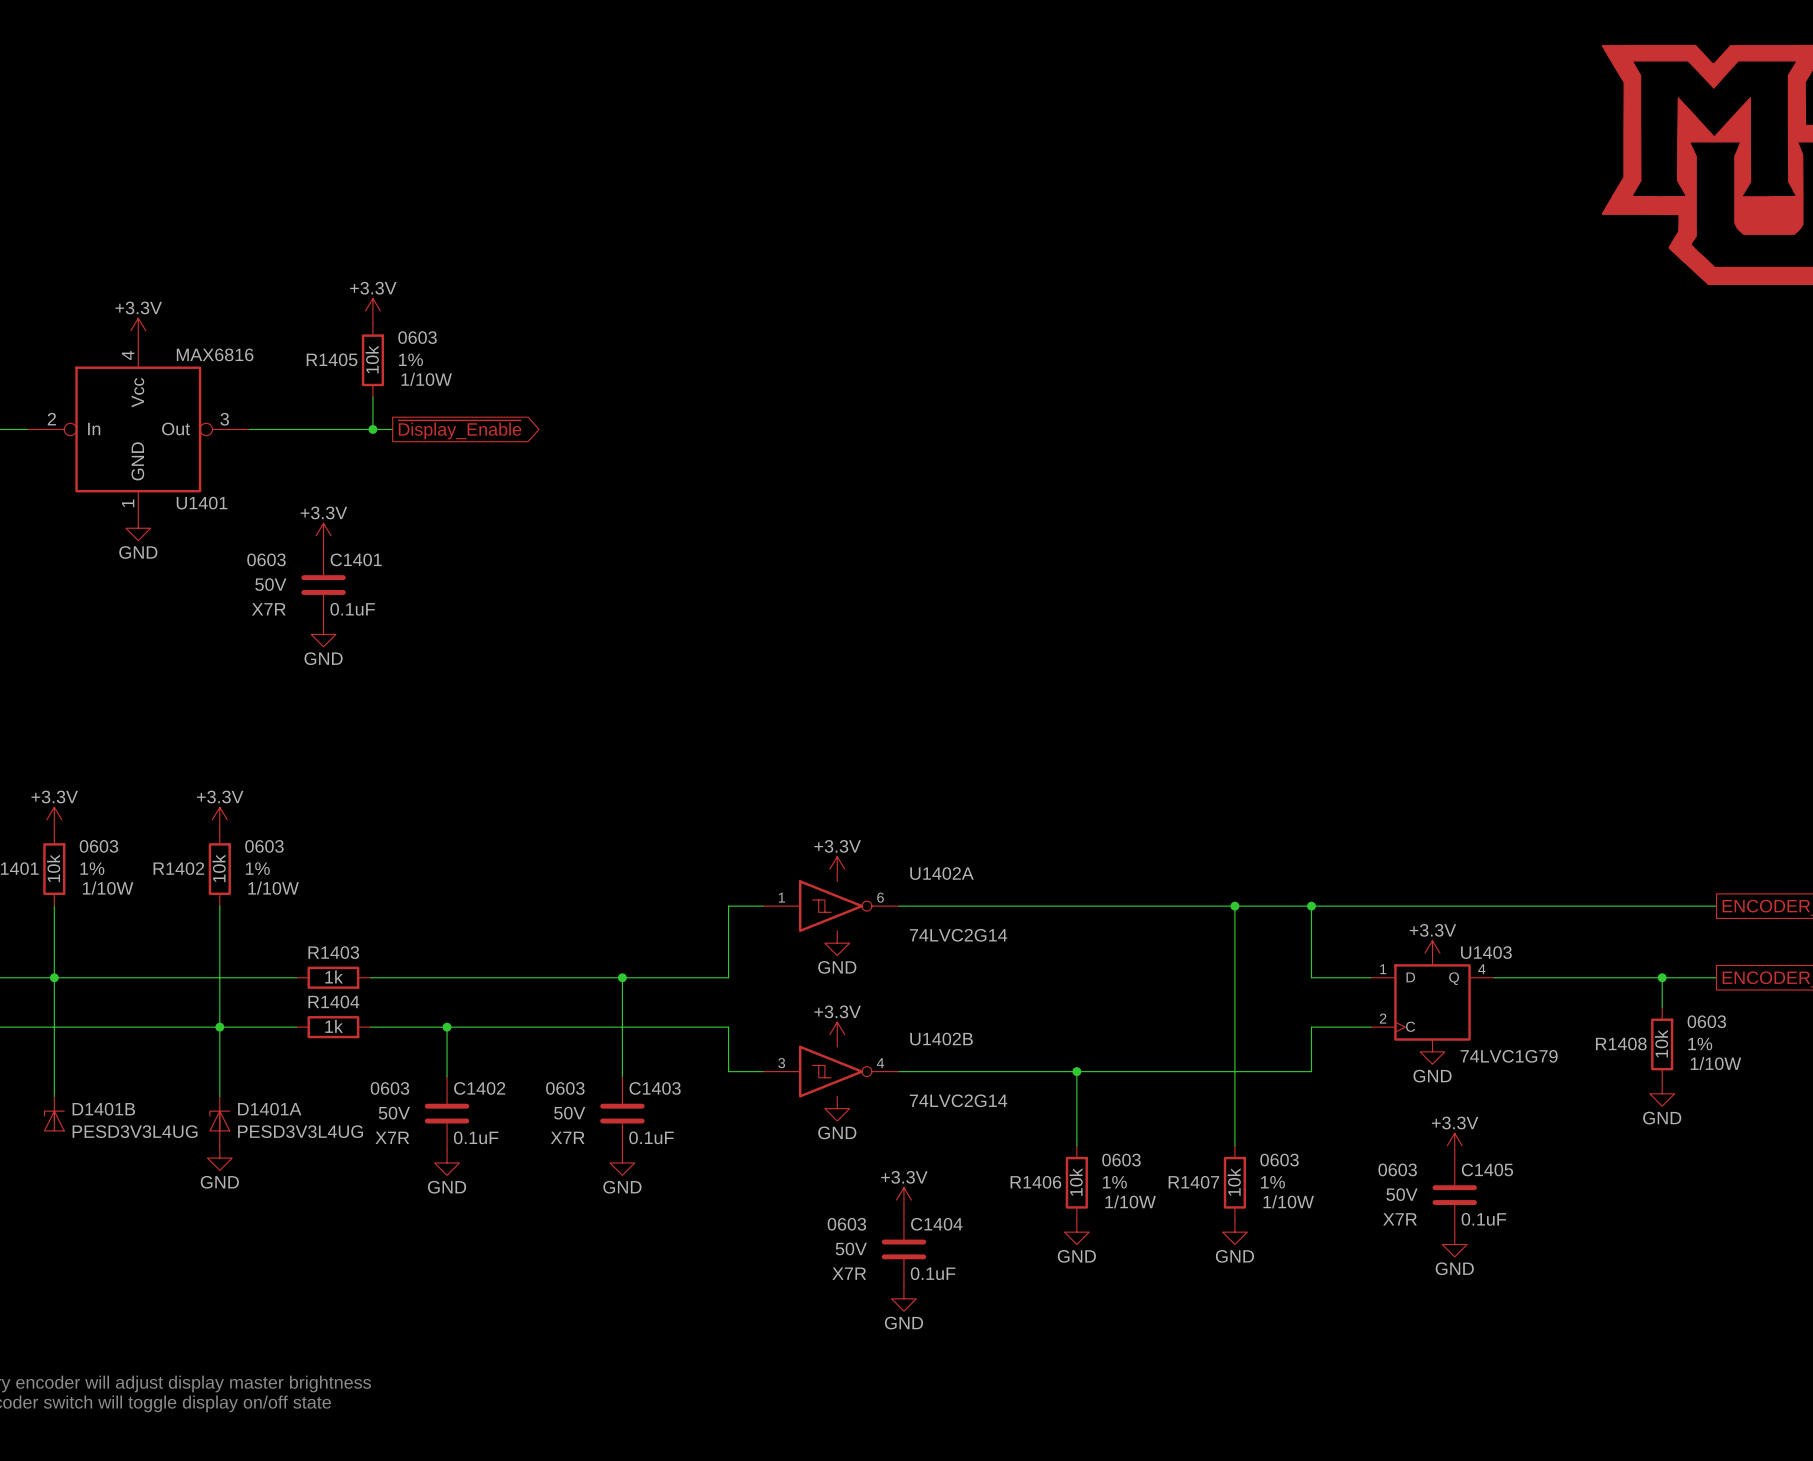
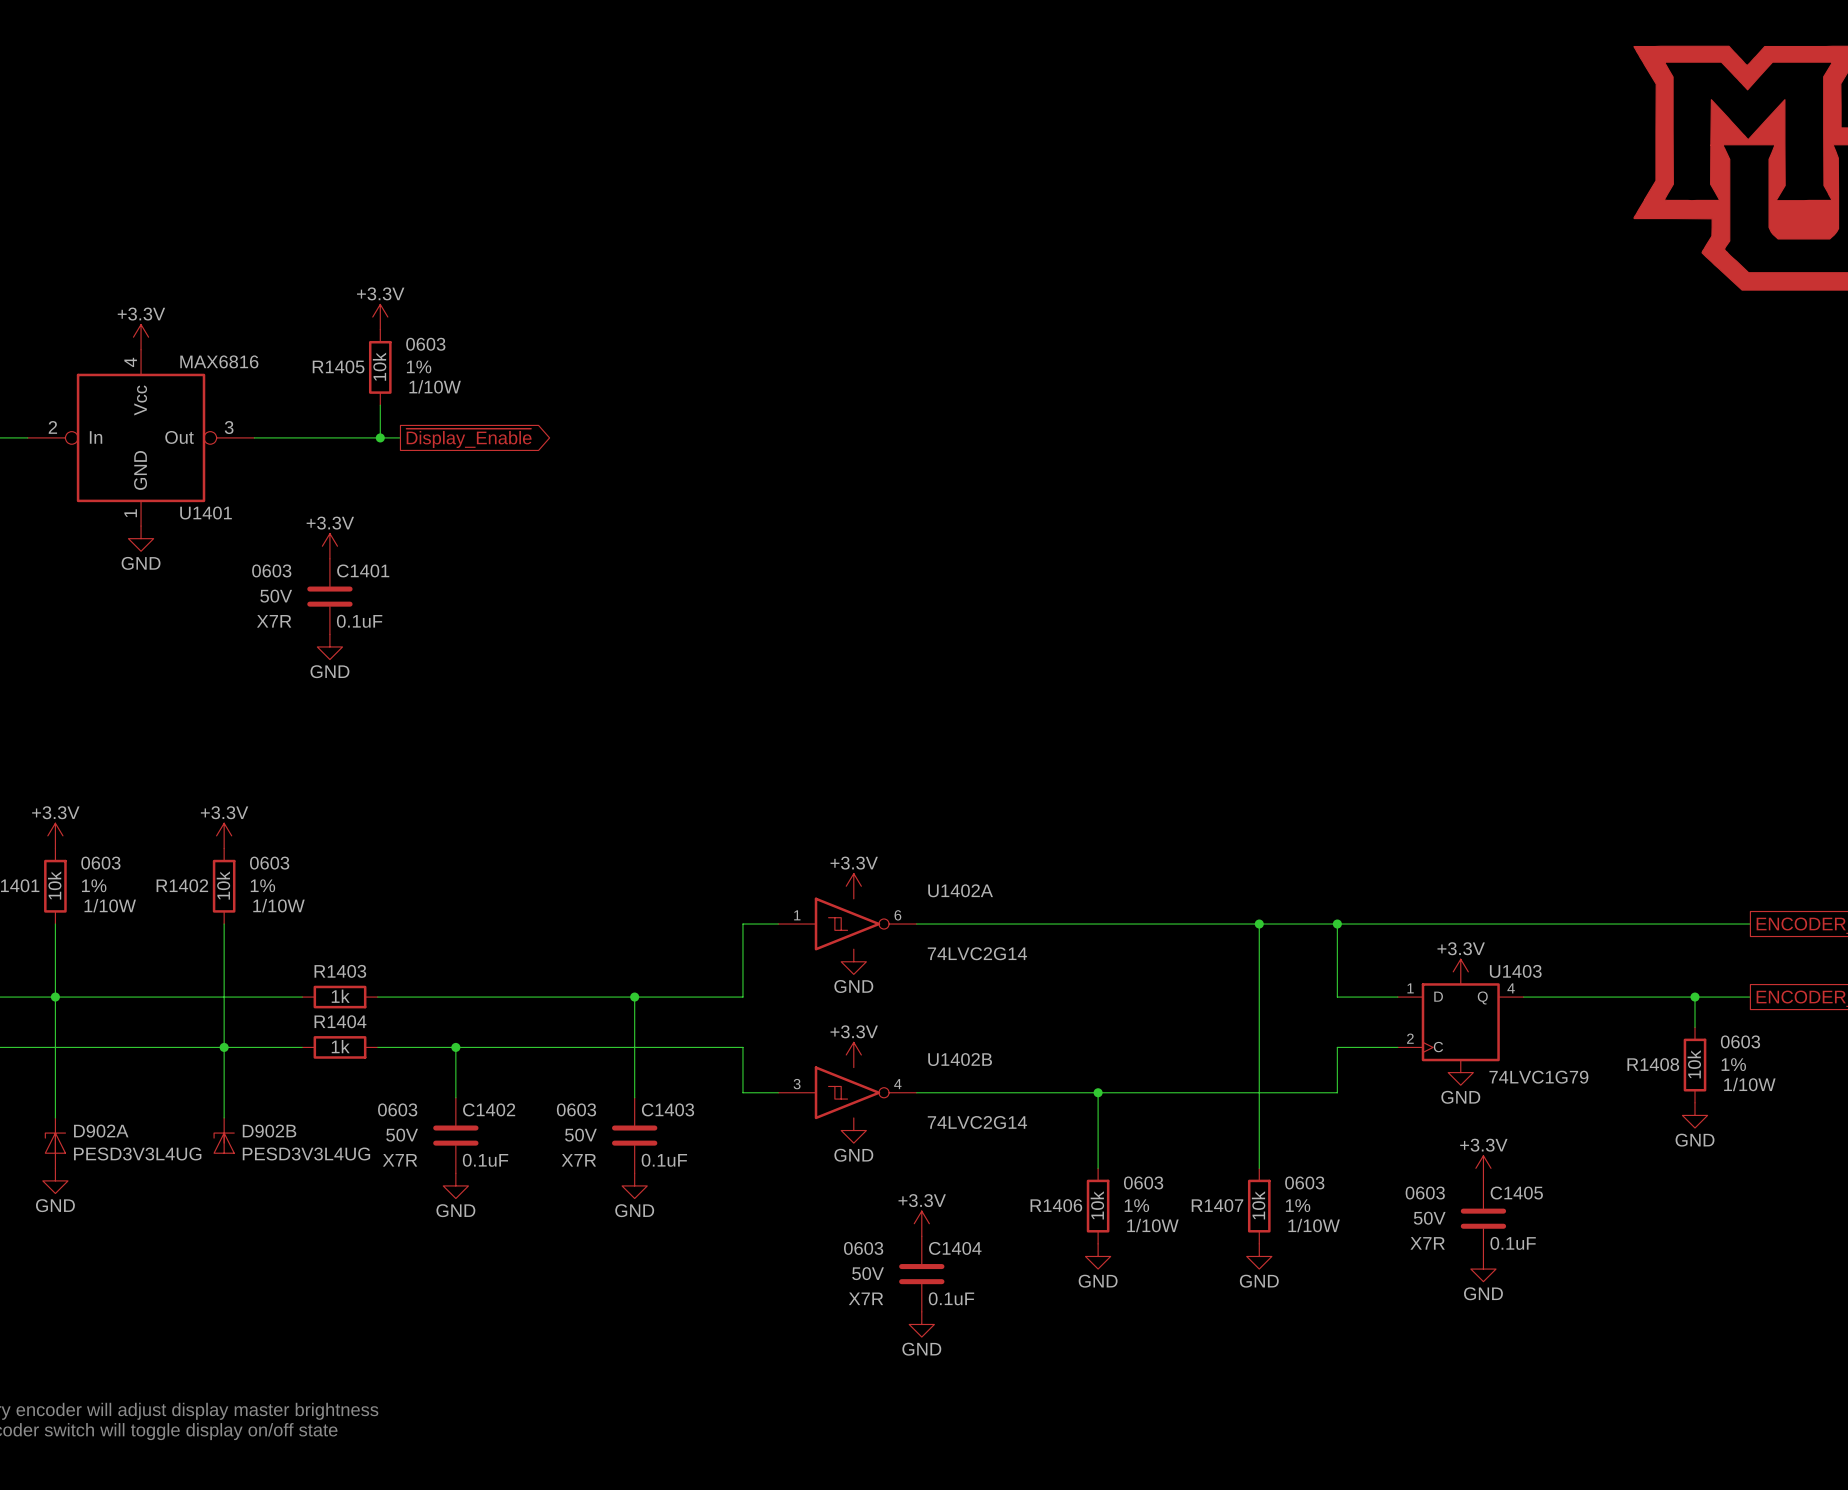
D1401B: PESD3V3L4UG (54, 1113) -> none
D902B: none -> PESD3V3L4UG (224, 1135)
D902A: none -> PESD3V3L4UG (55, 1143)
D1401A: PESD3V3L4UG (219, 1121) -> none
power symbol position: GND (219, 1158) -> GND (55, 1180)

